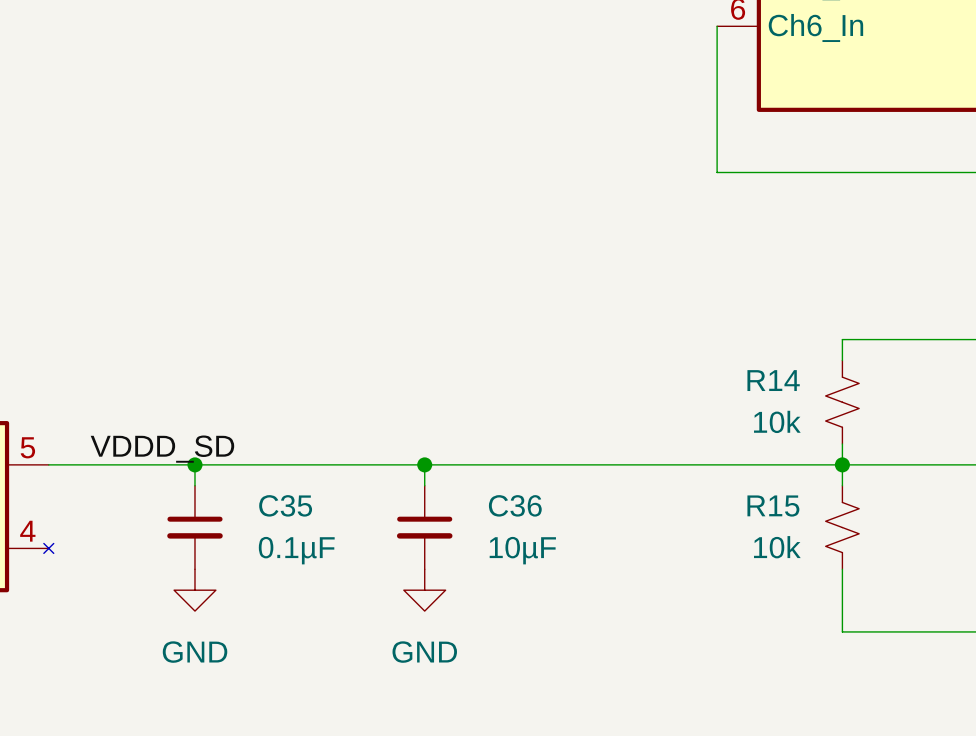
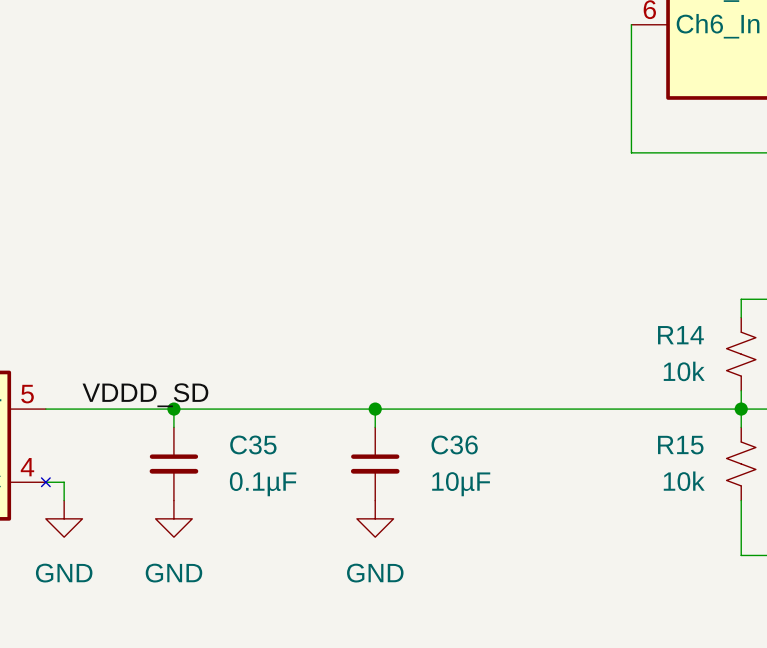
wire: none -> (45, 482) (64, 482) (64, 500)
power symbol: none -> GND (64, 518)

